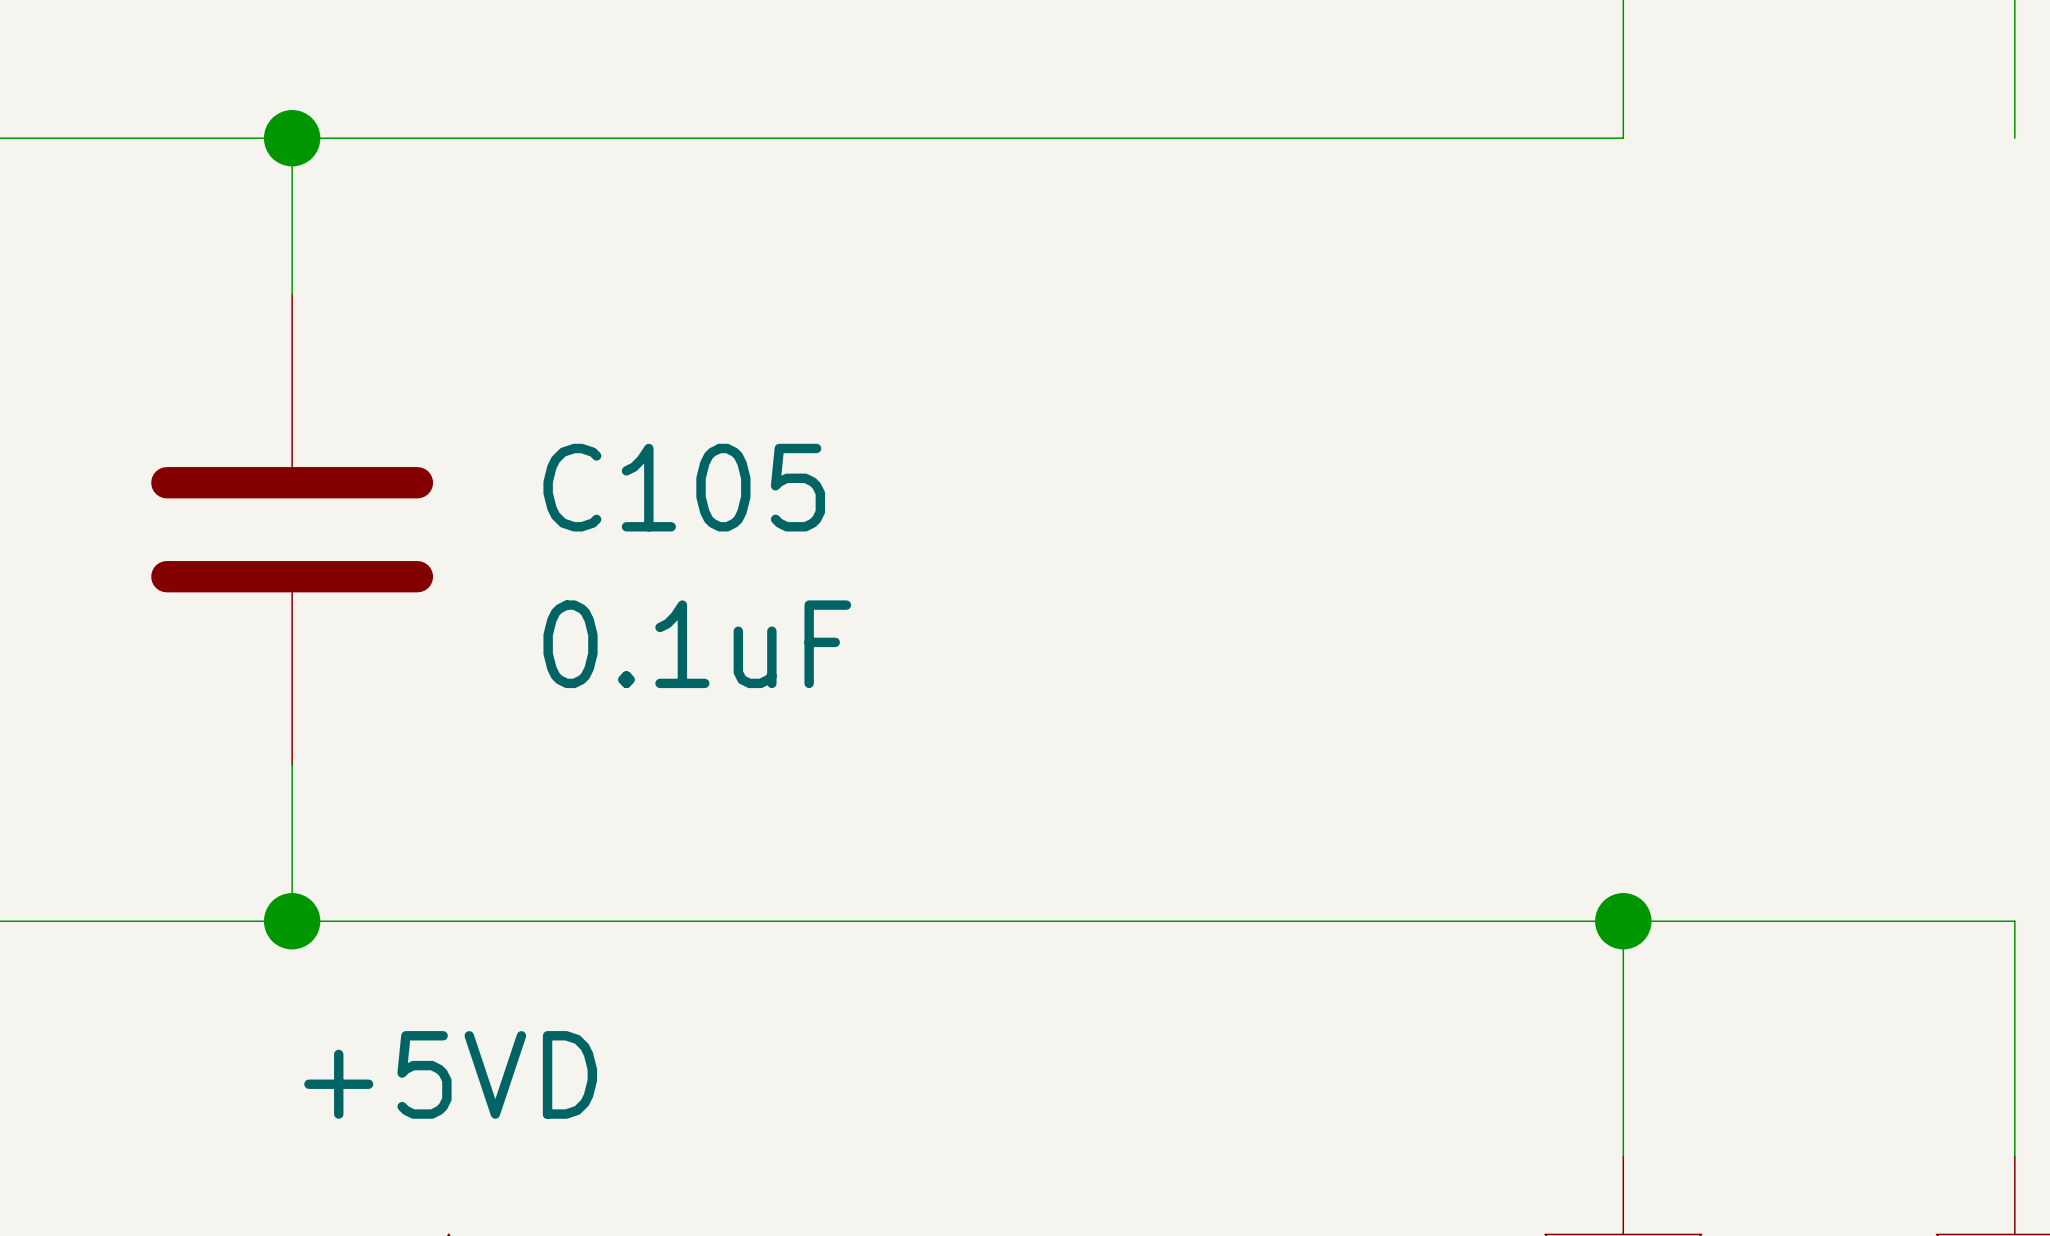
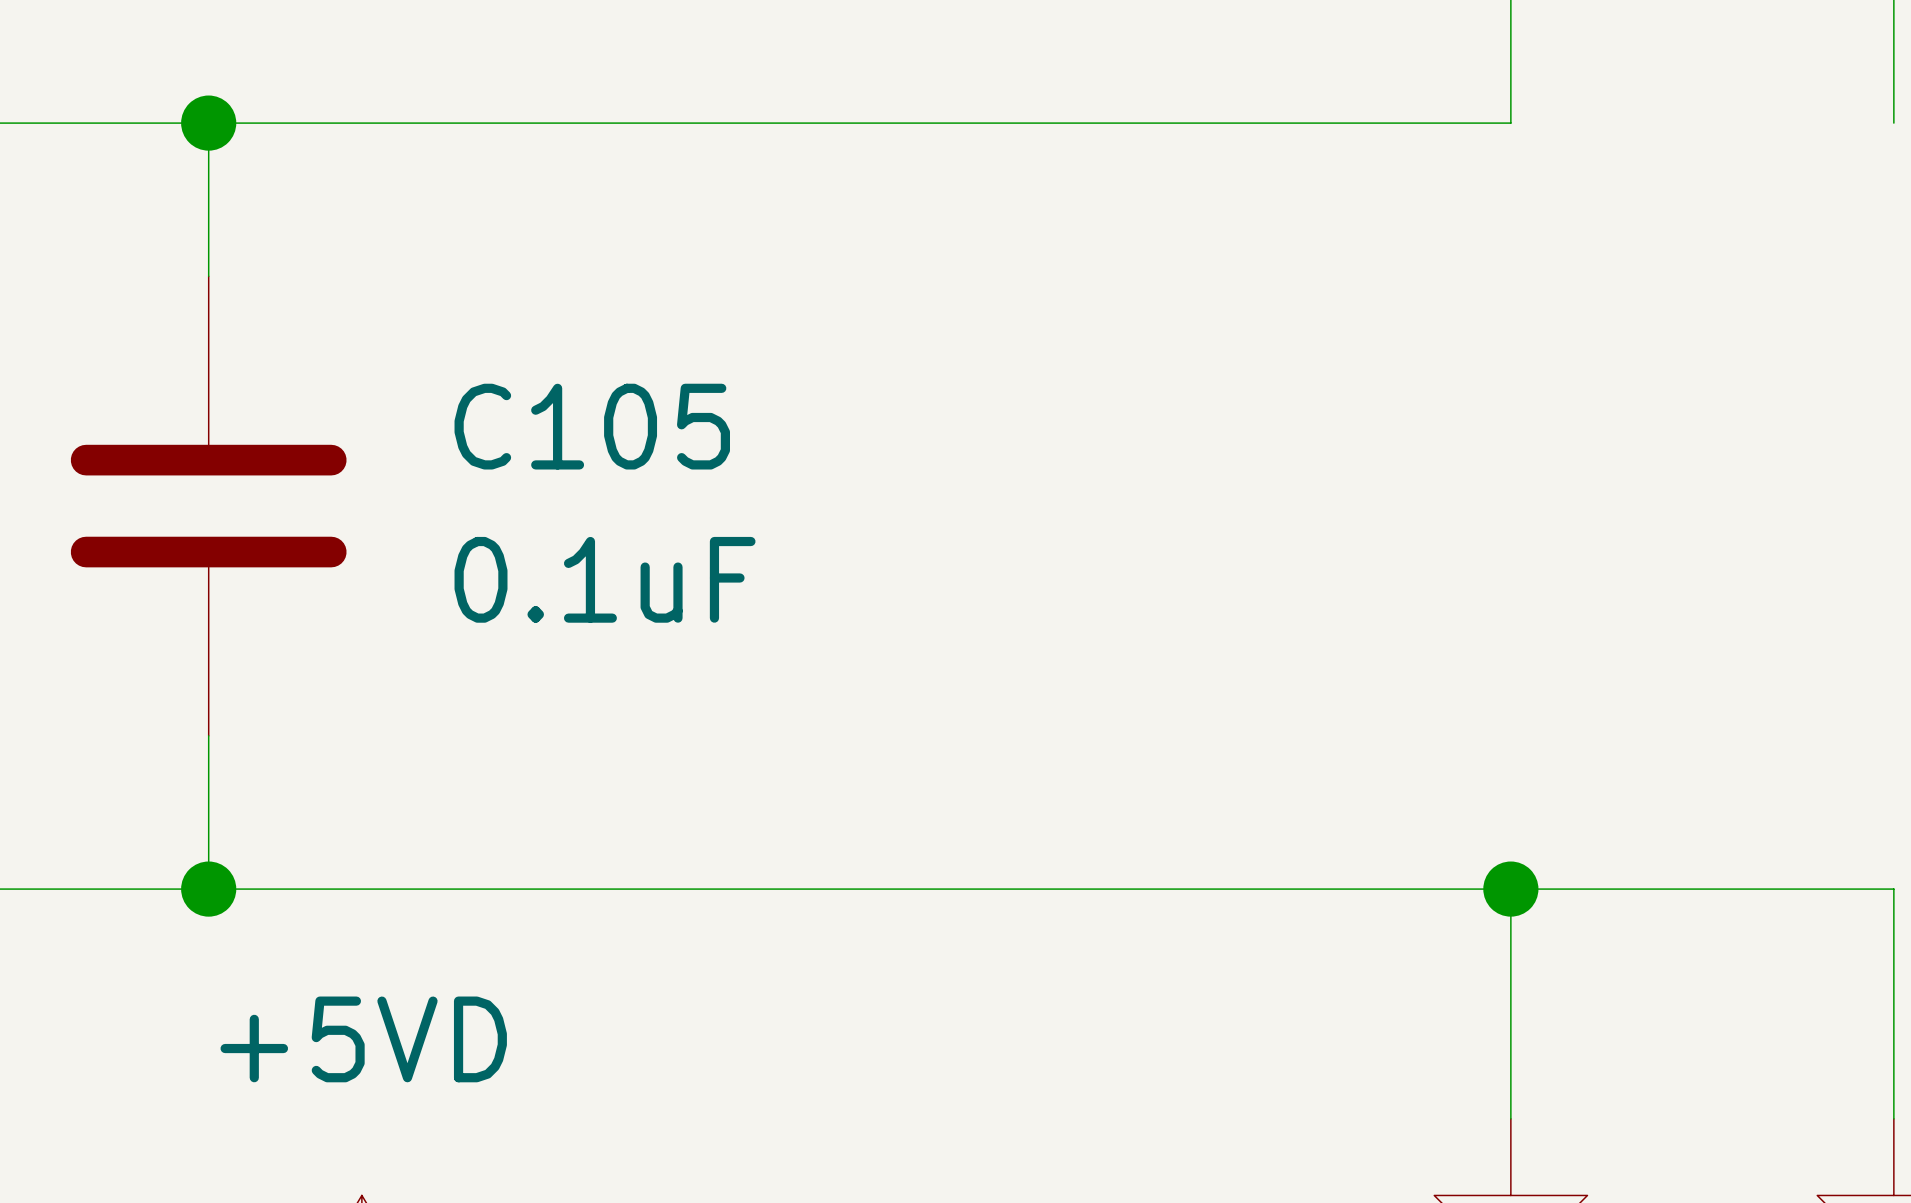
C105 name position: C105 (684, 487) -> C105 (592, 426)
C105 value position: 0.1uF (697, 644) -> 0.1uF (605, 579)

